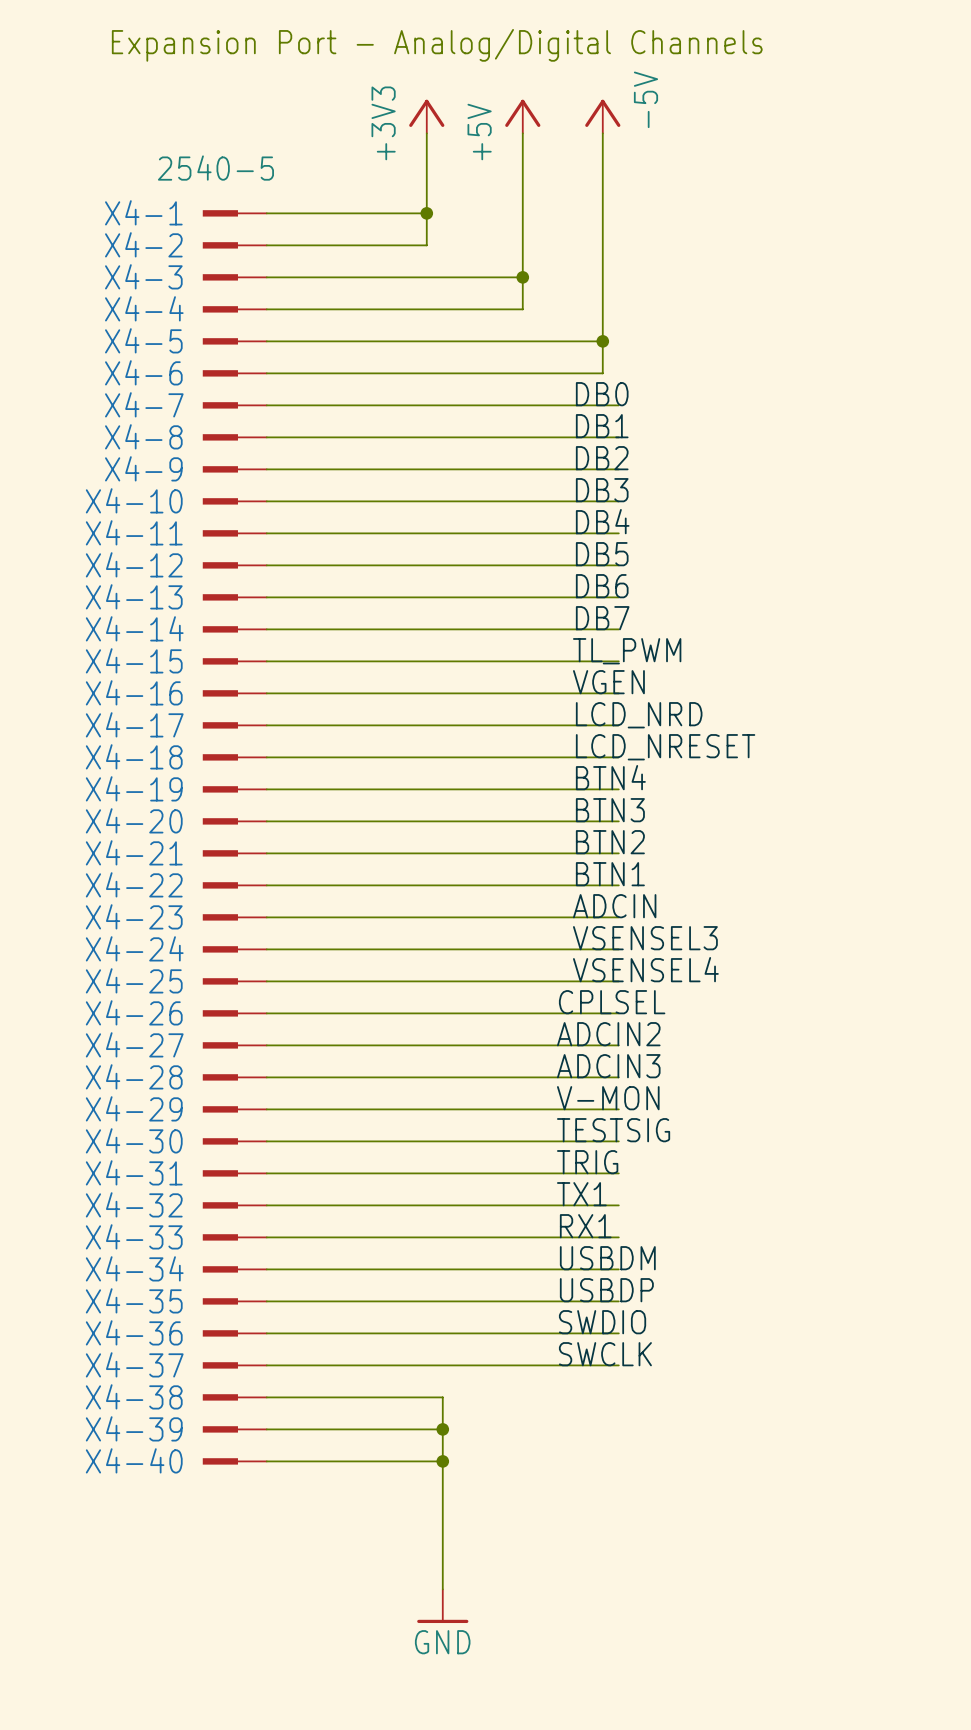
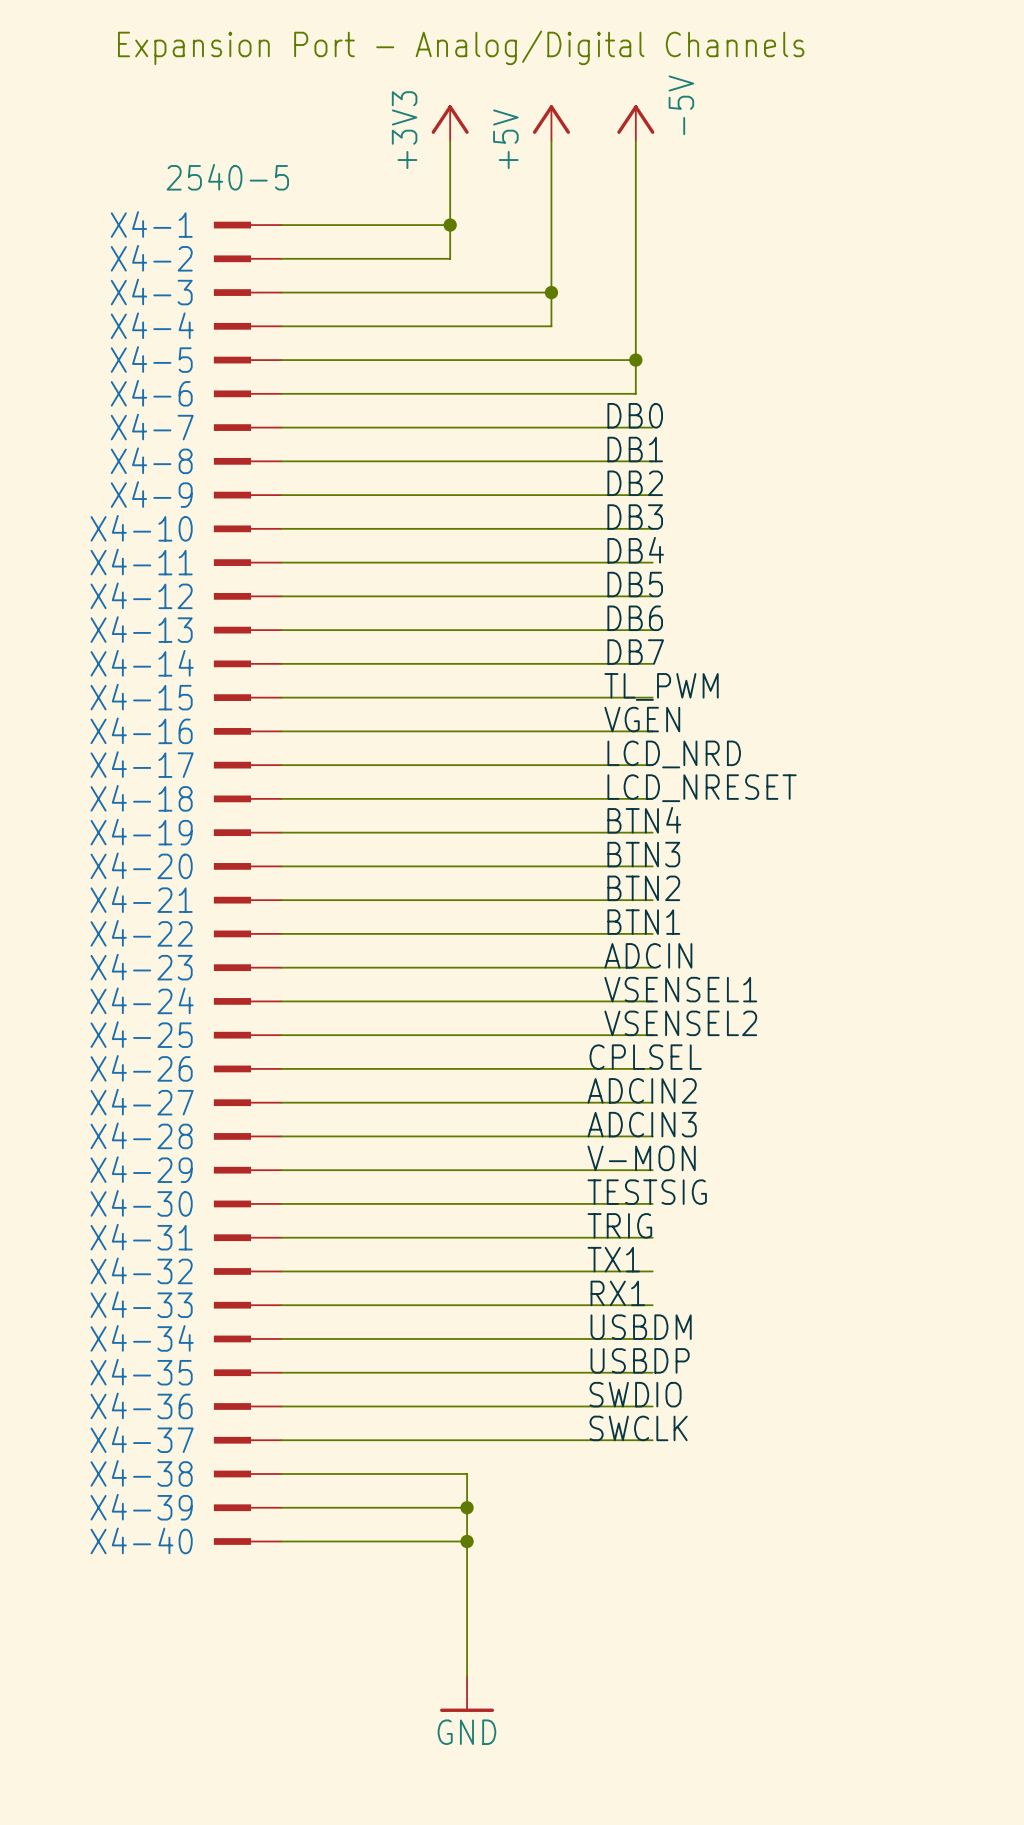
label: VSENSEL3 (645, 938) -> VSENSEL1 (680, 989)
label: VSENSEL4 (645, 969) -> VSENSEL2 (680, 1023)

